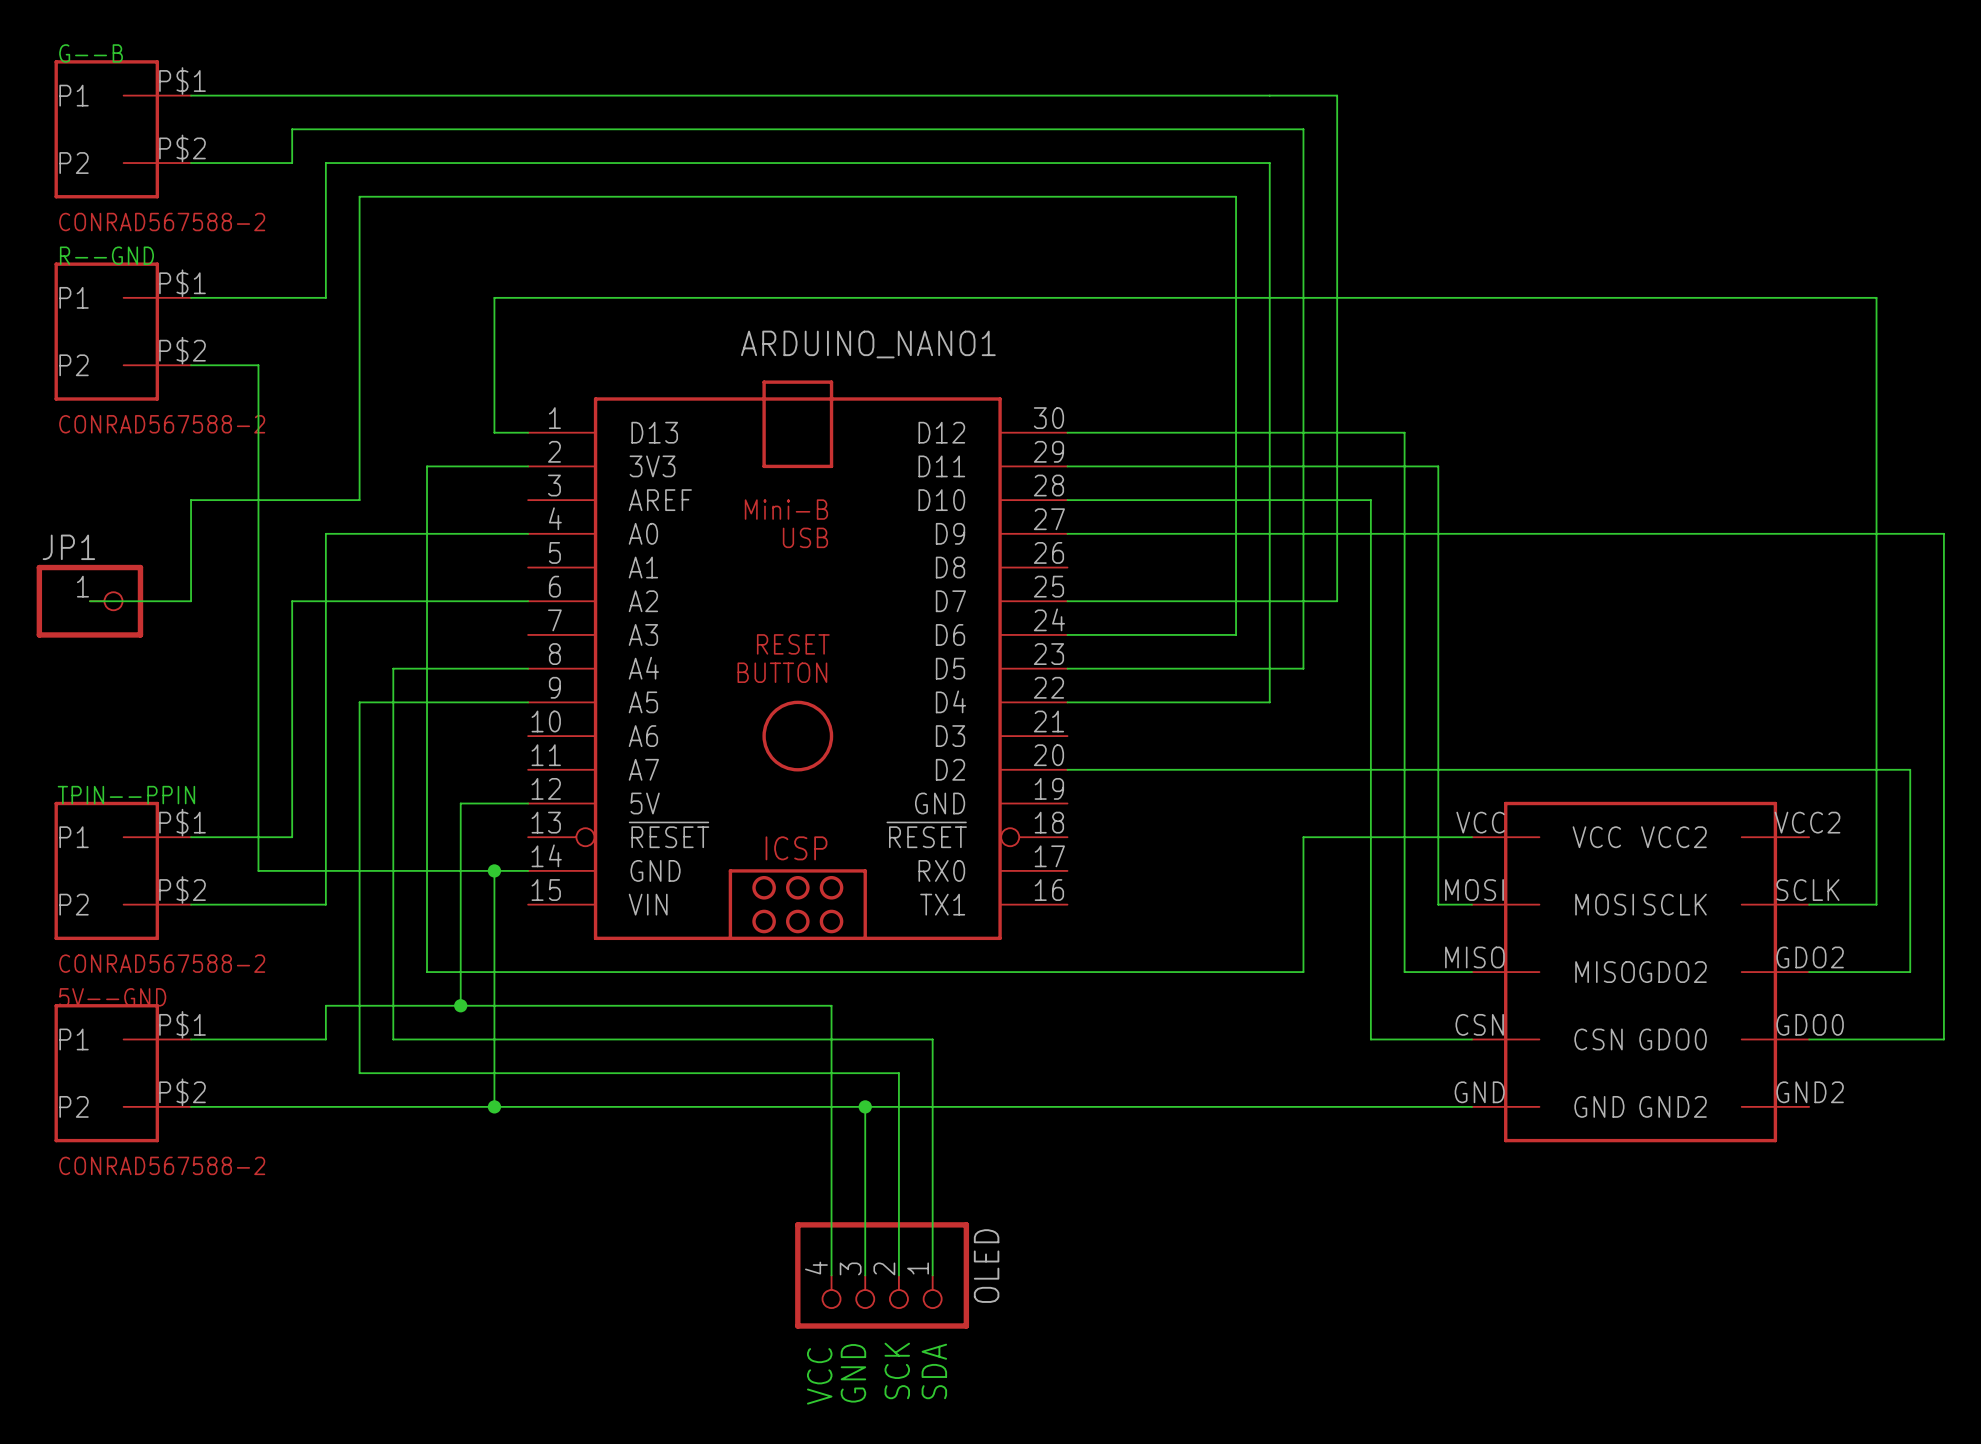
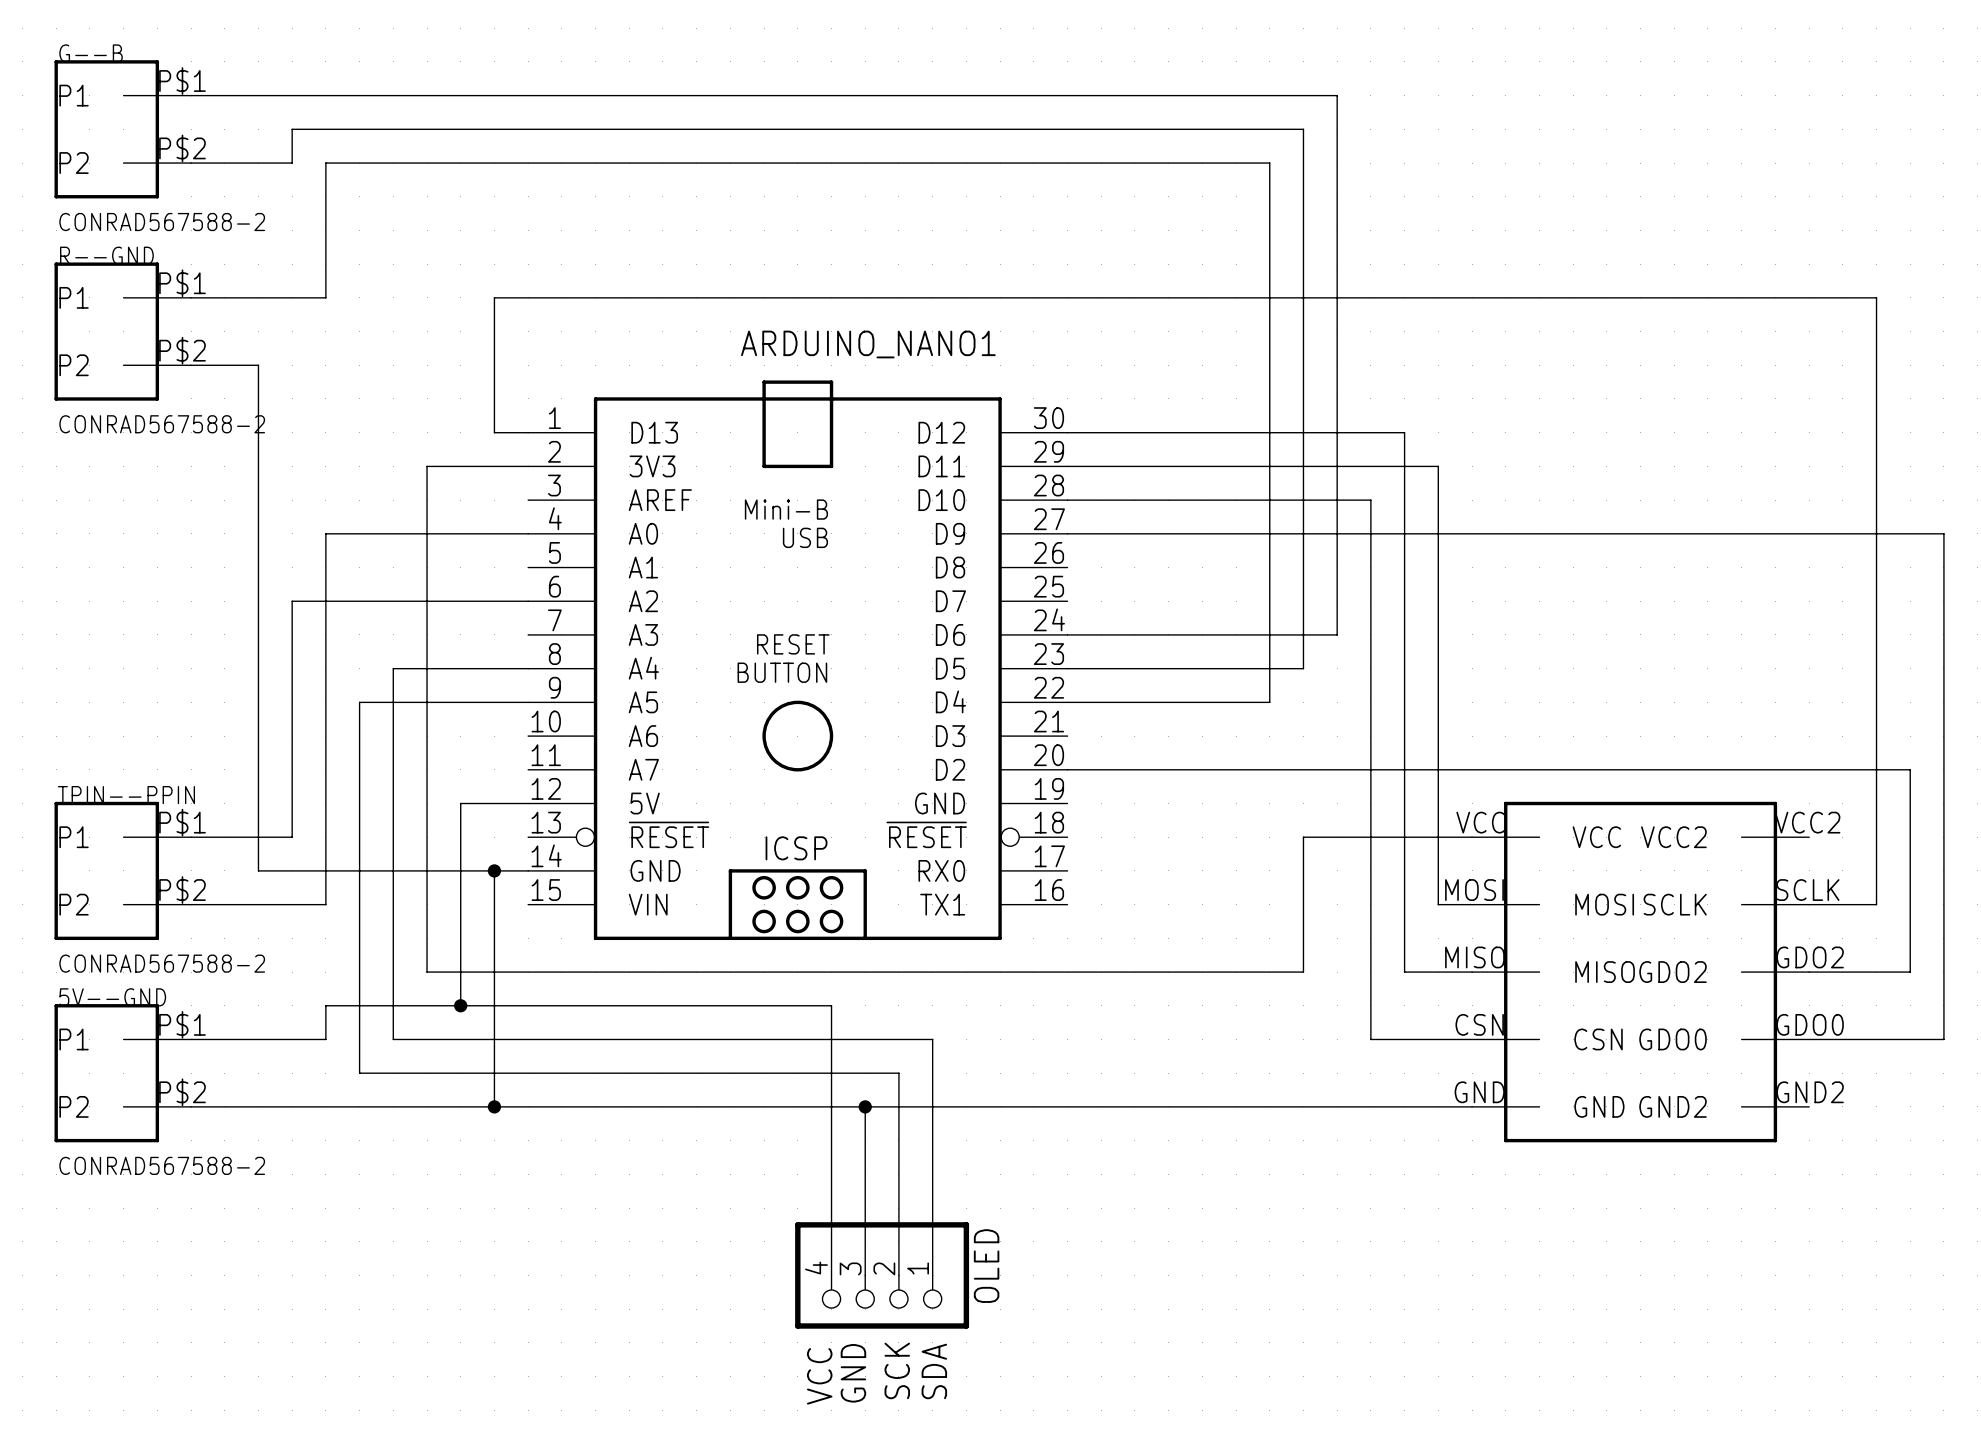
wire: (89, 601) (191, 601) (191, 500) (359, 500) (359, 196) (1236, 196) (1236, 634) -> none
JP1: (89, 601) -> none
wire: (1067, 601) (1337, 601) -> (1236, 634) (1337, 634) (1337, 601)

